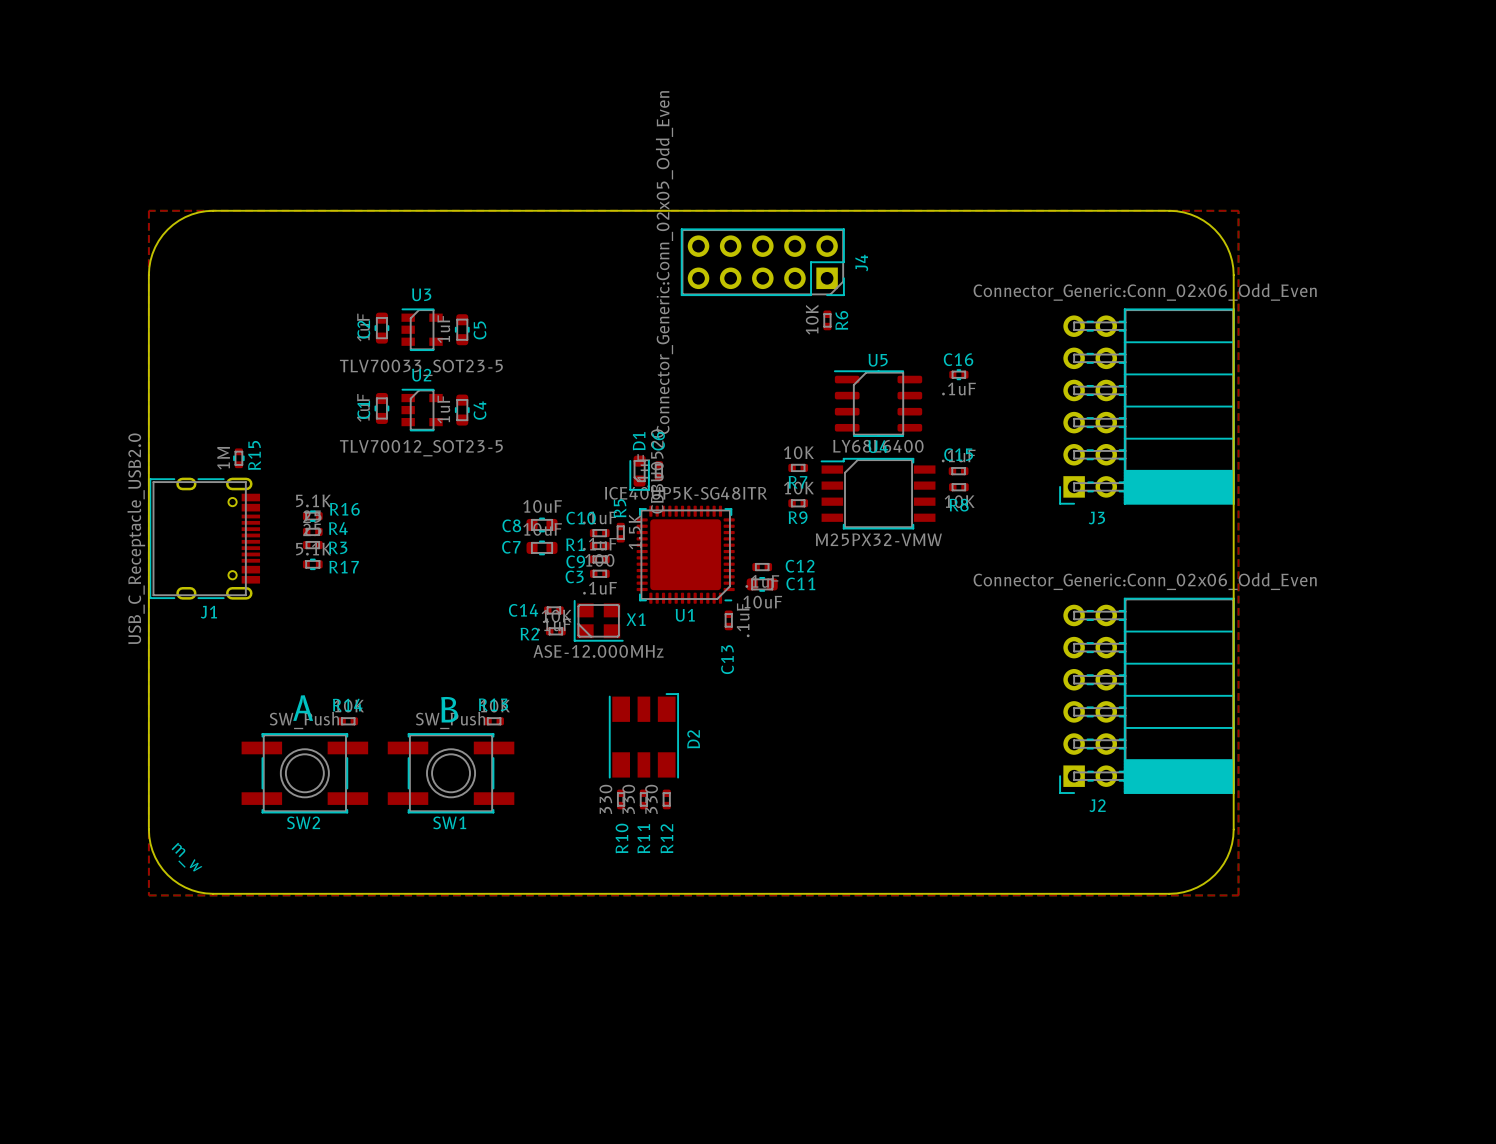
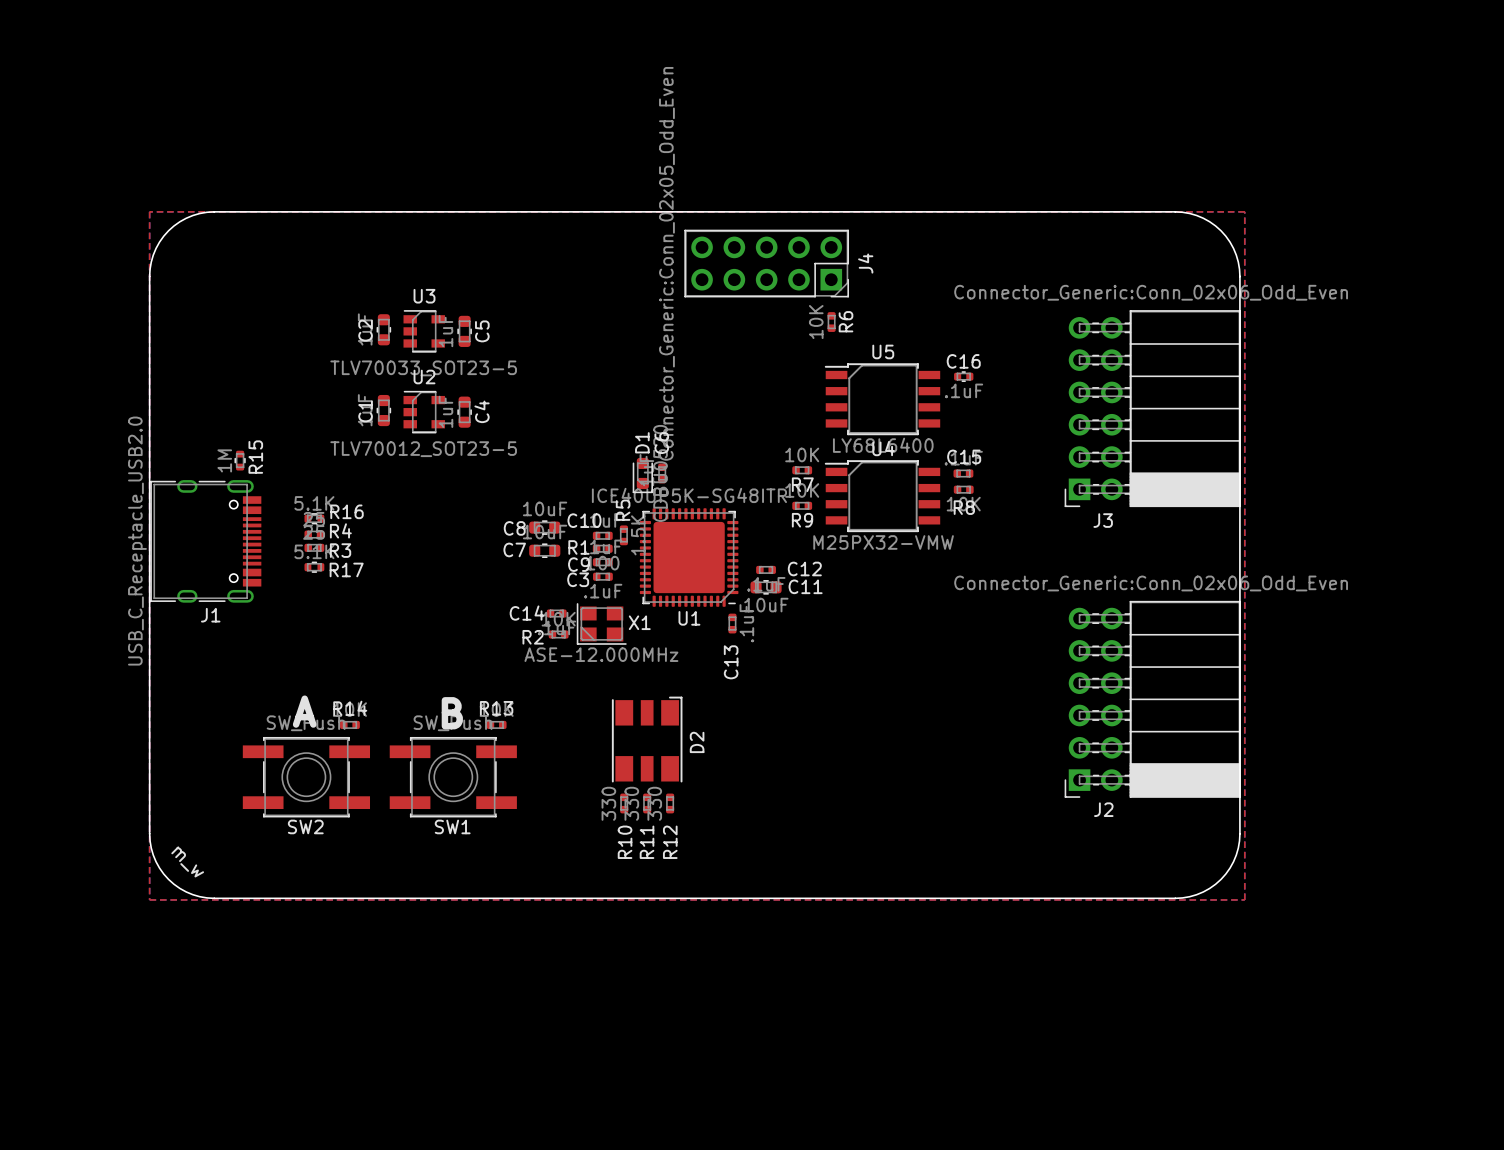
U5 footprint: [834, 370, 923, 437] -> [824, 363, 941, 436]

